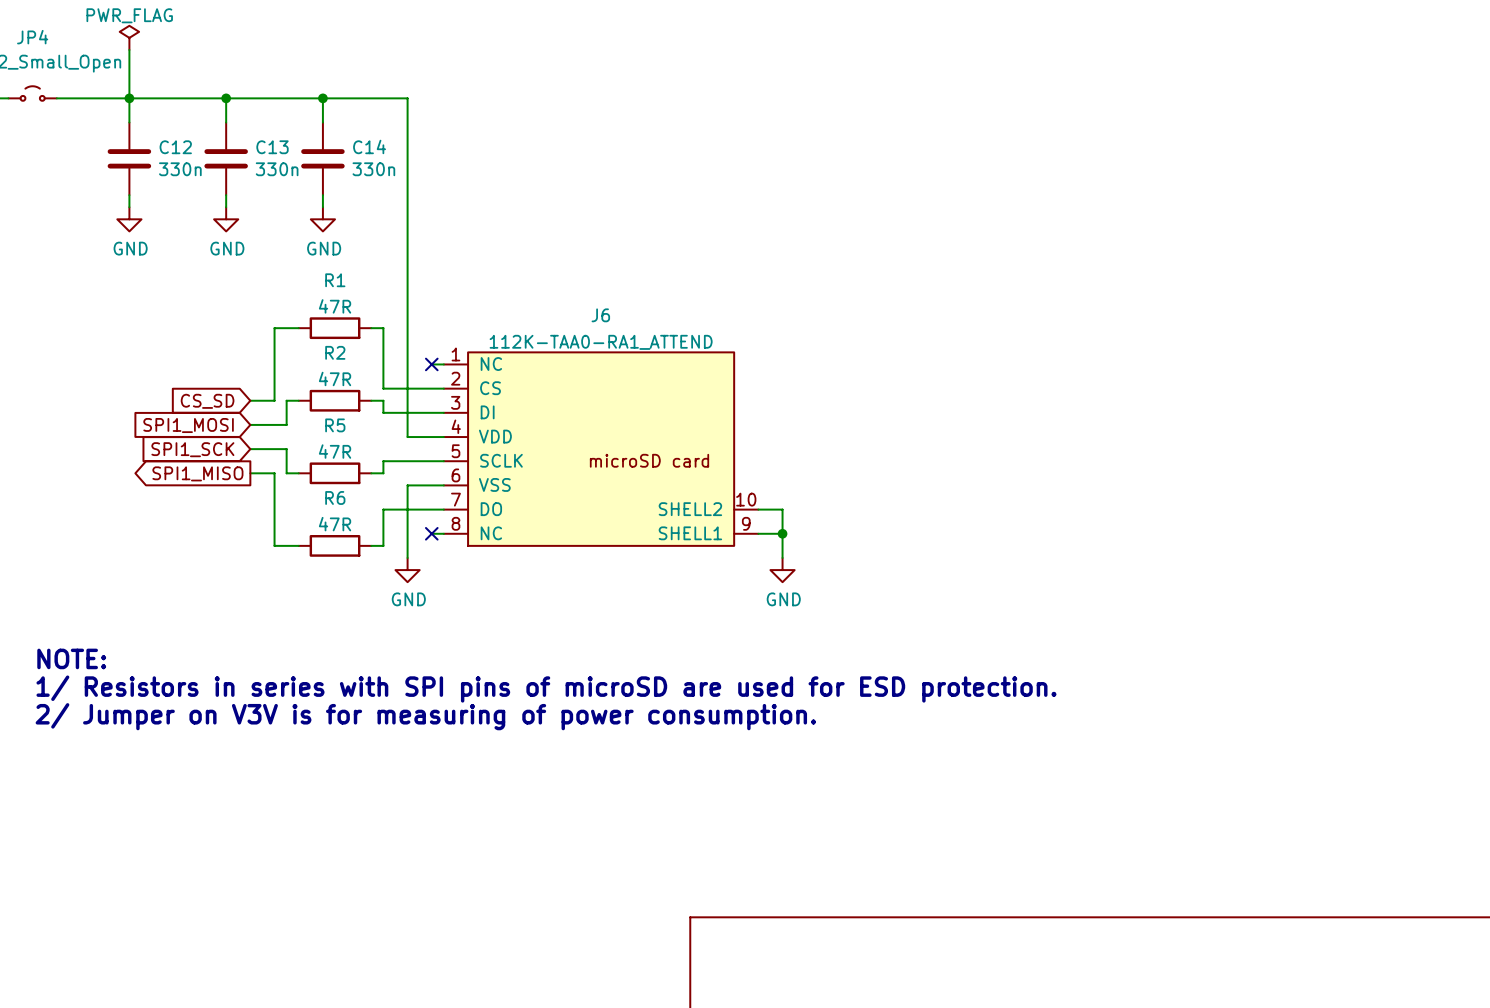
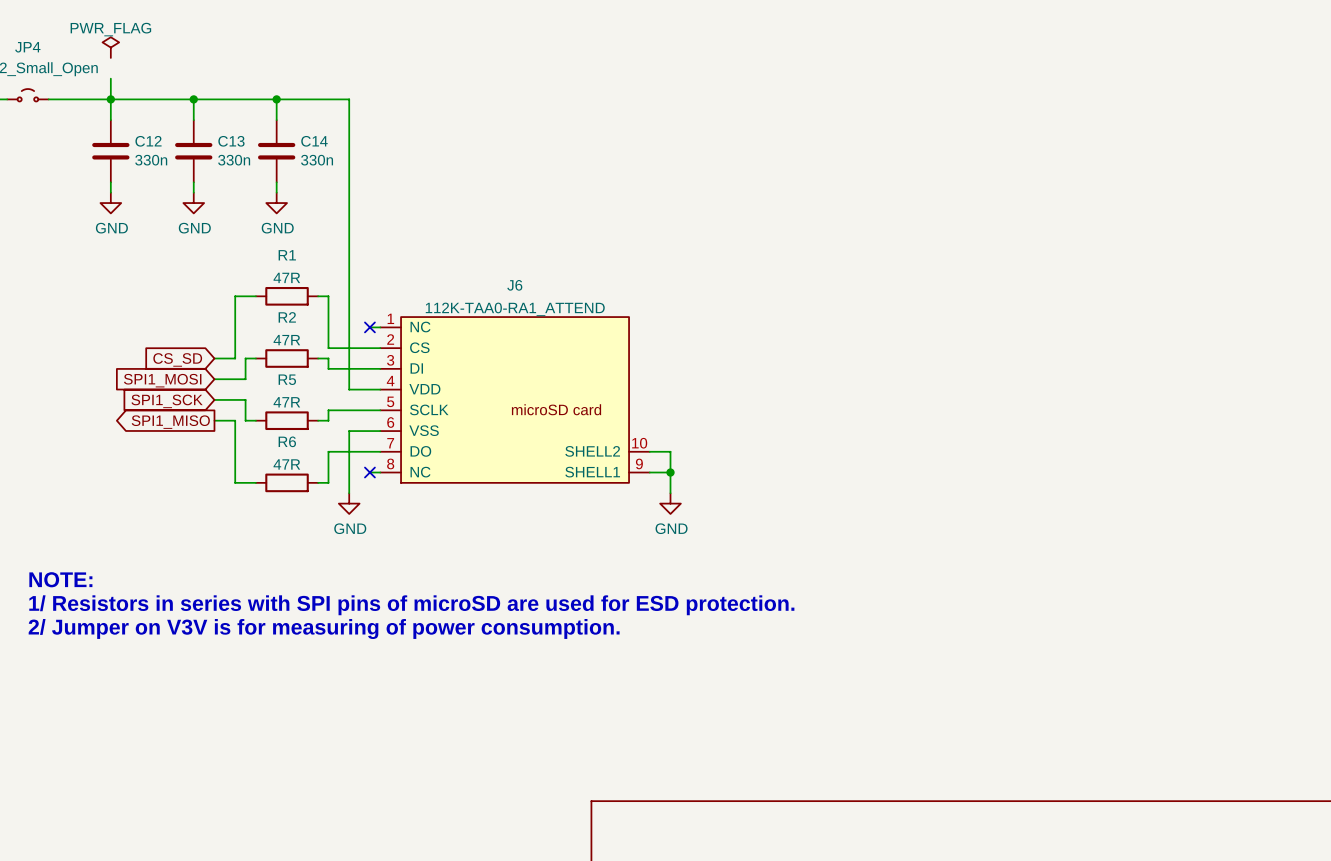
wire: (129, 49) (129, 74) -> none

